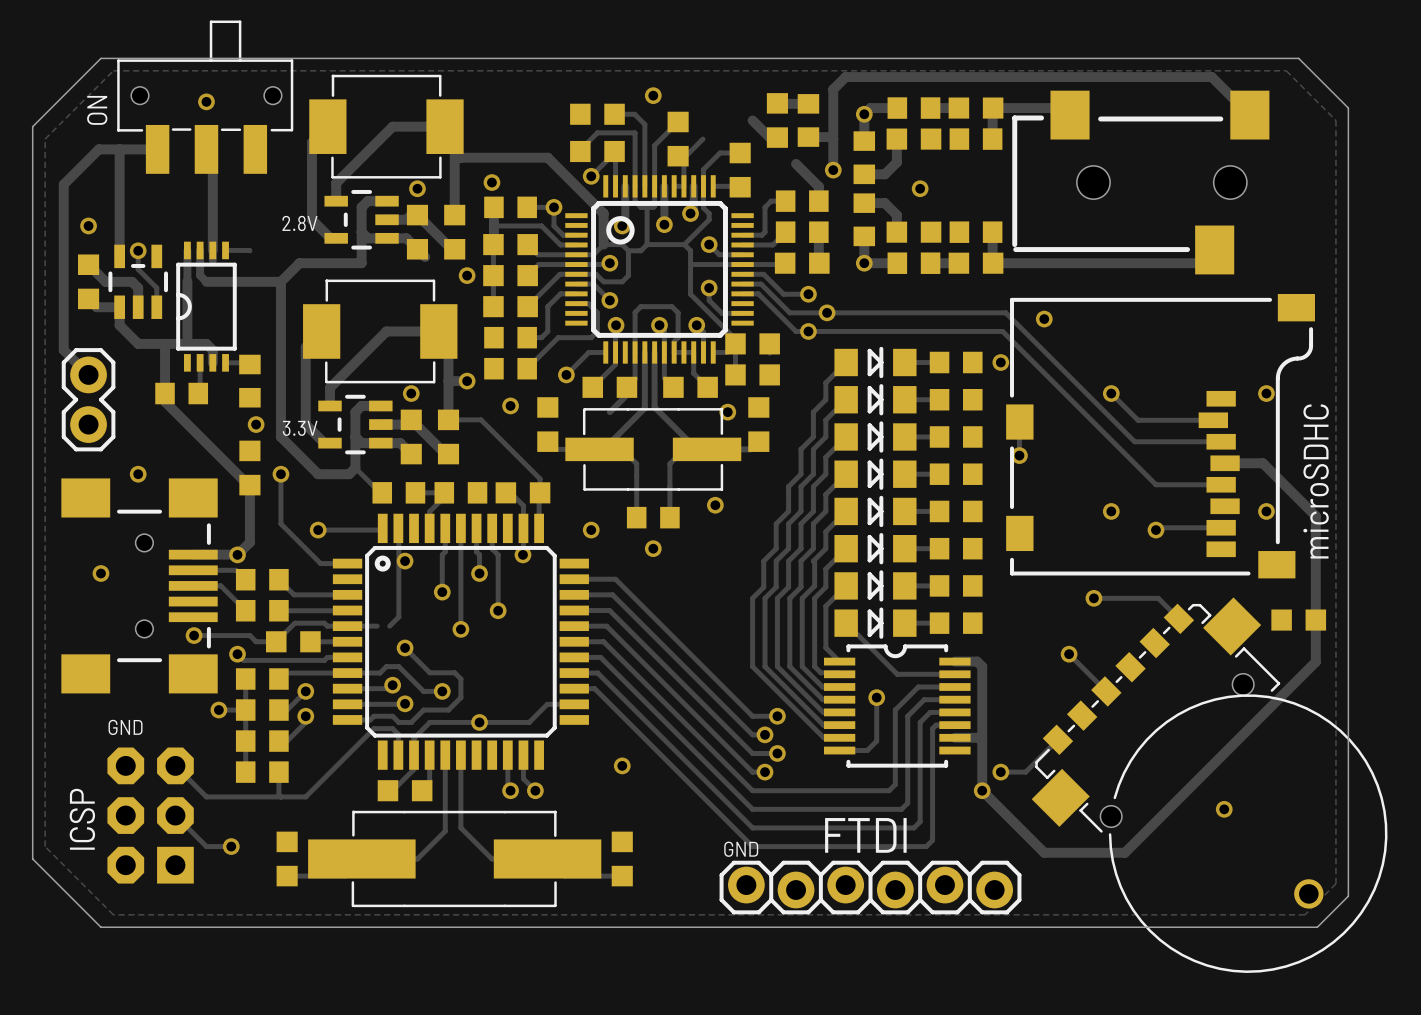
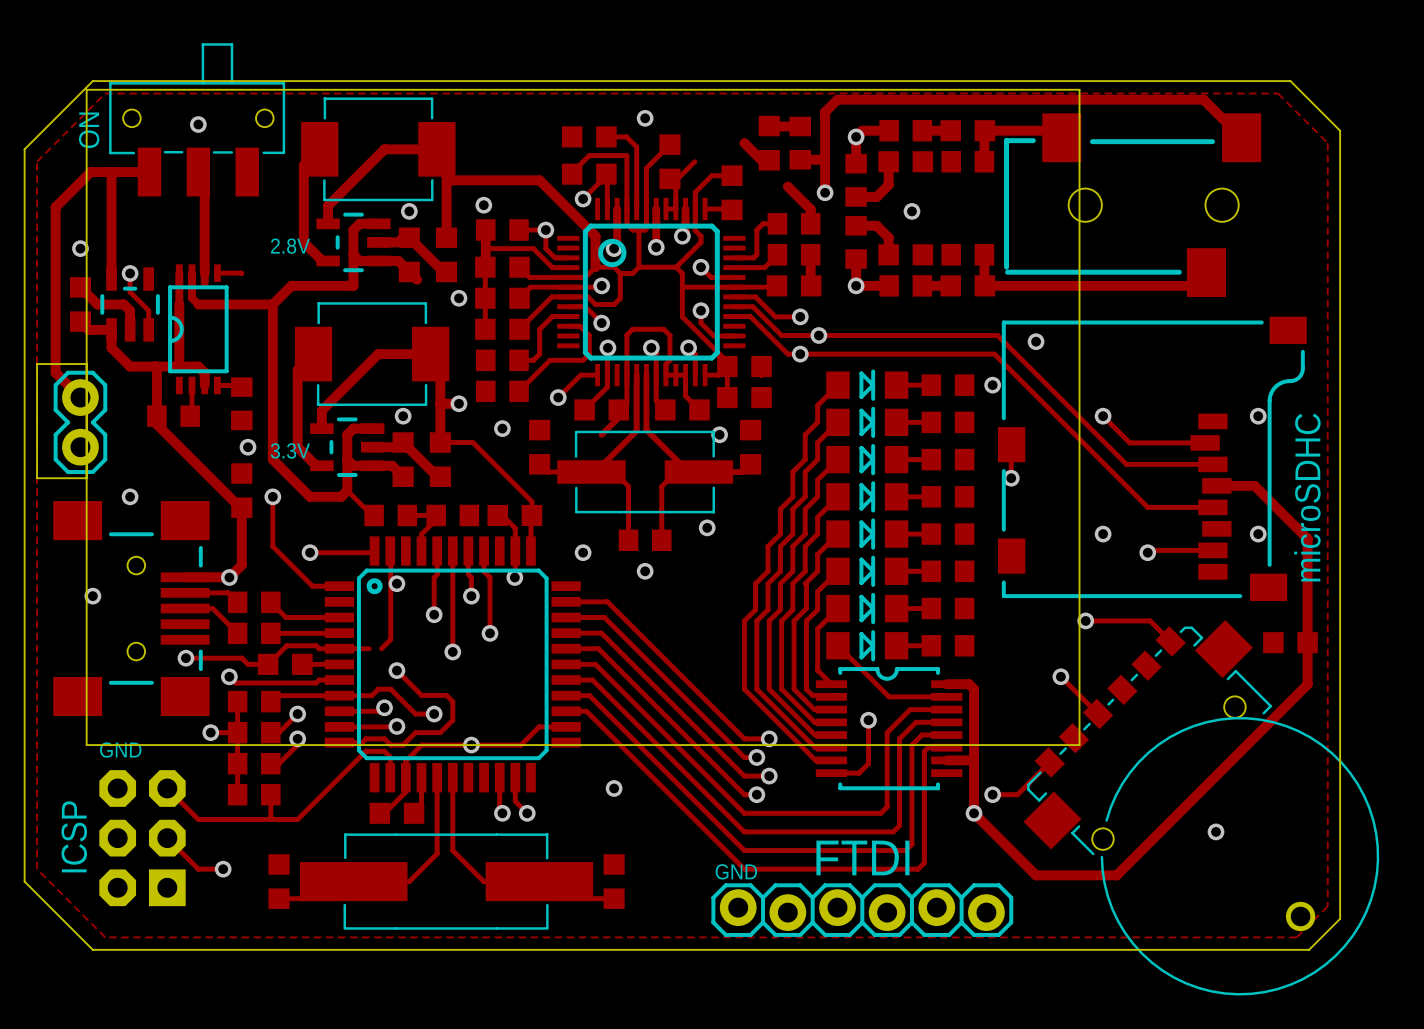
board edge: none -> (86, 89) (1079, 89) (1079, 745) (86, 745) (86, 89)
board edge: none -> (86, 364) (37, 364) (37, 478) (86, 478)

